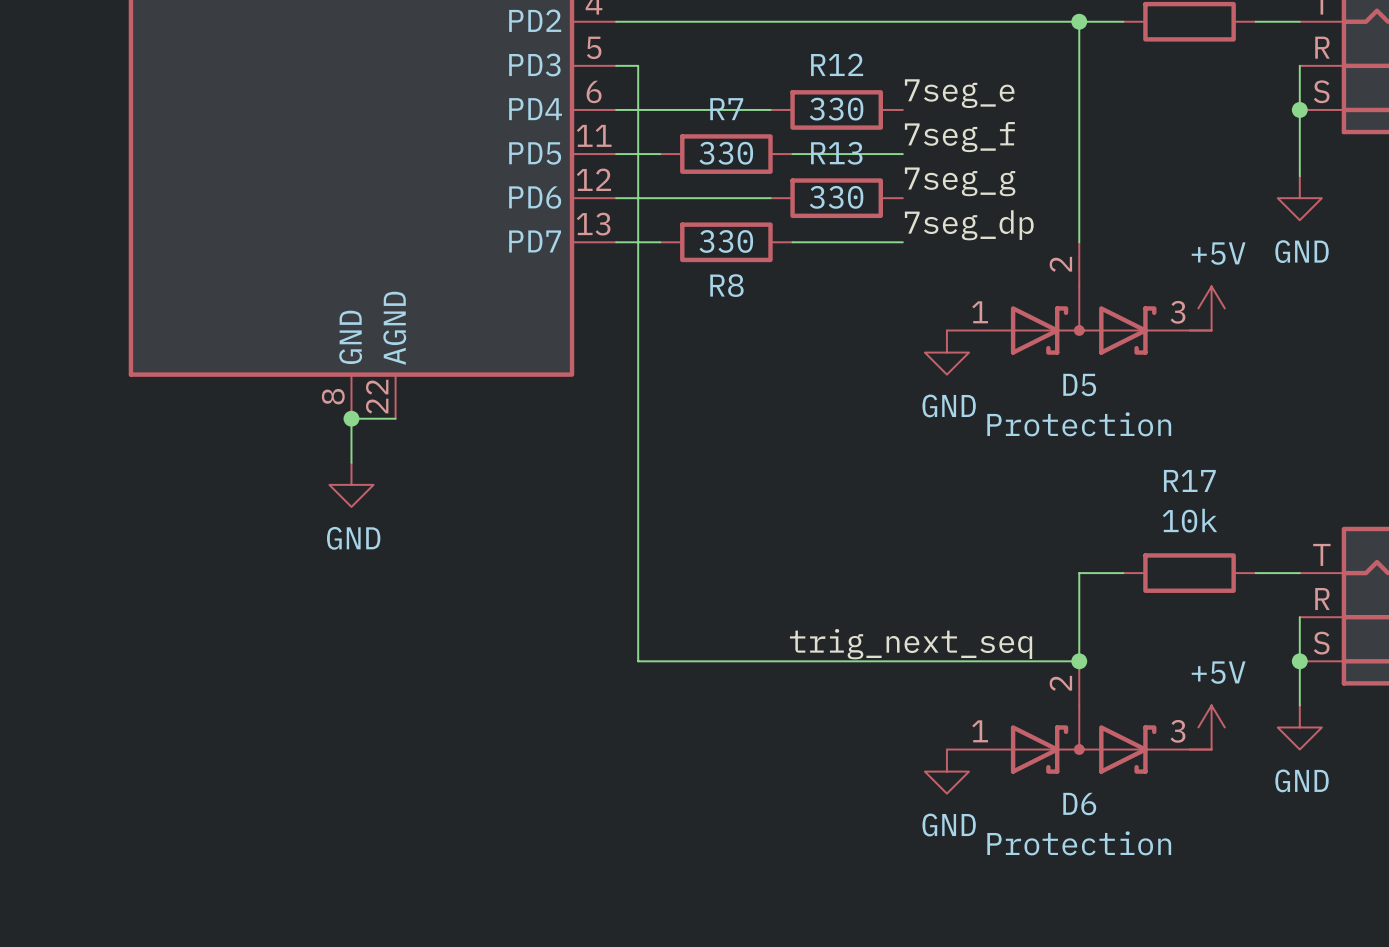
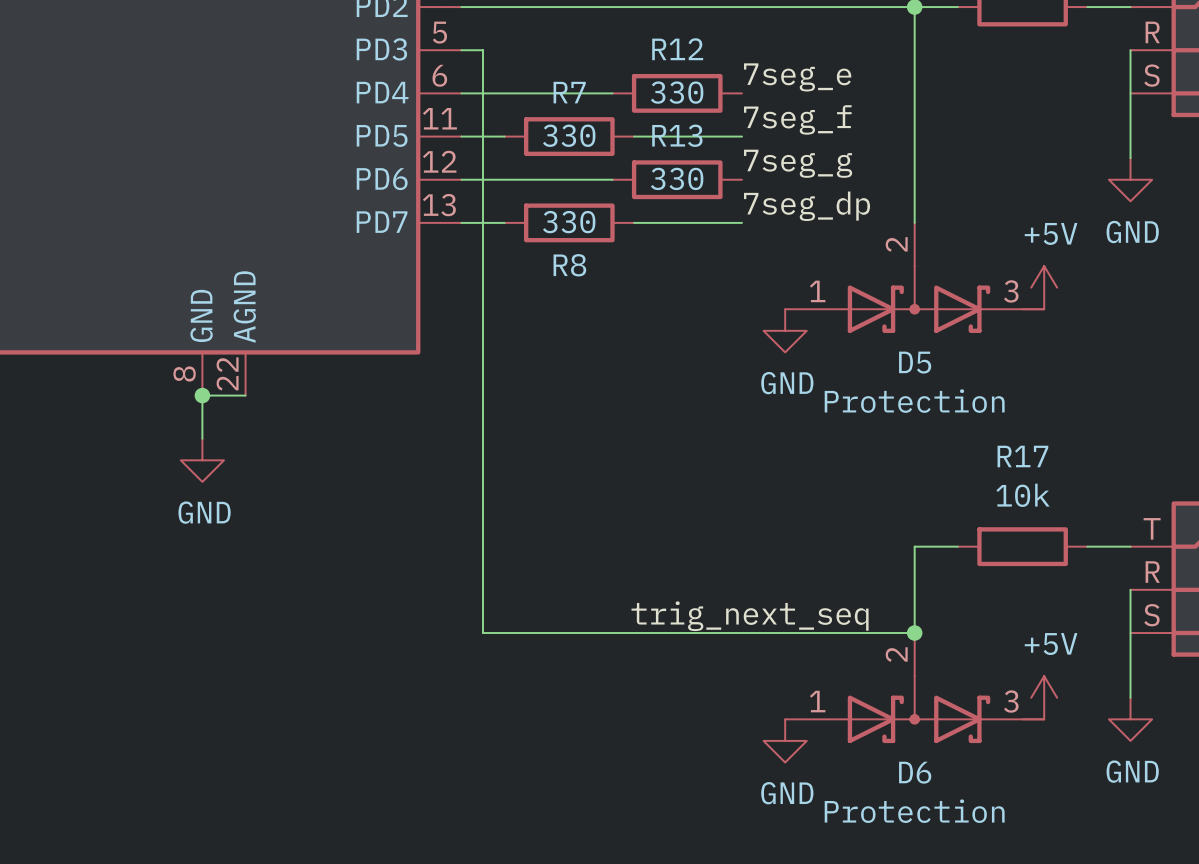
junction: (1299, 109) -> none
junction: (1299, 661) -> none
power symbol position: GND (1299, 727) -> GND (1130, 719)

